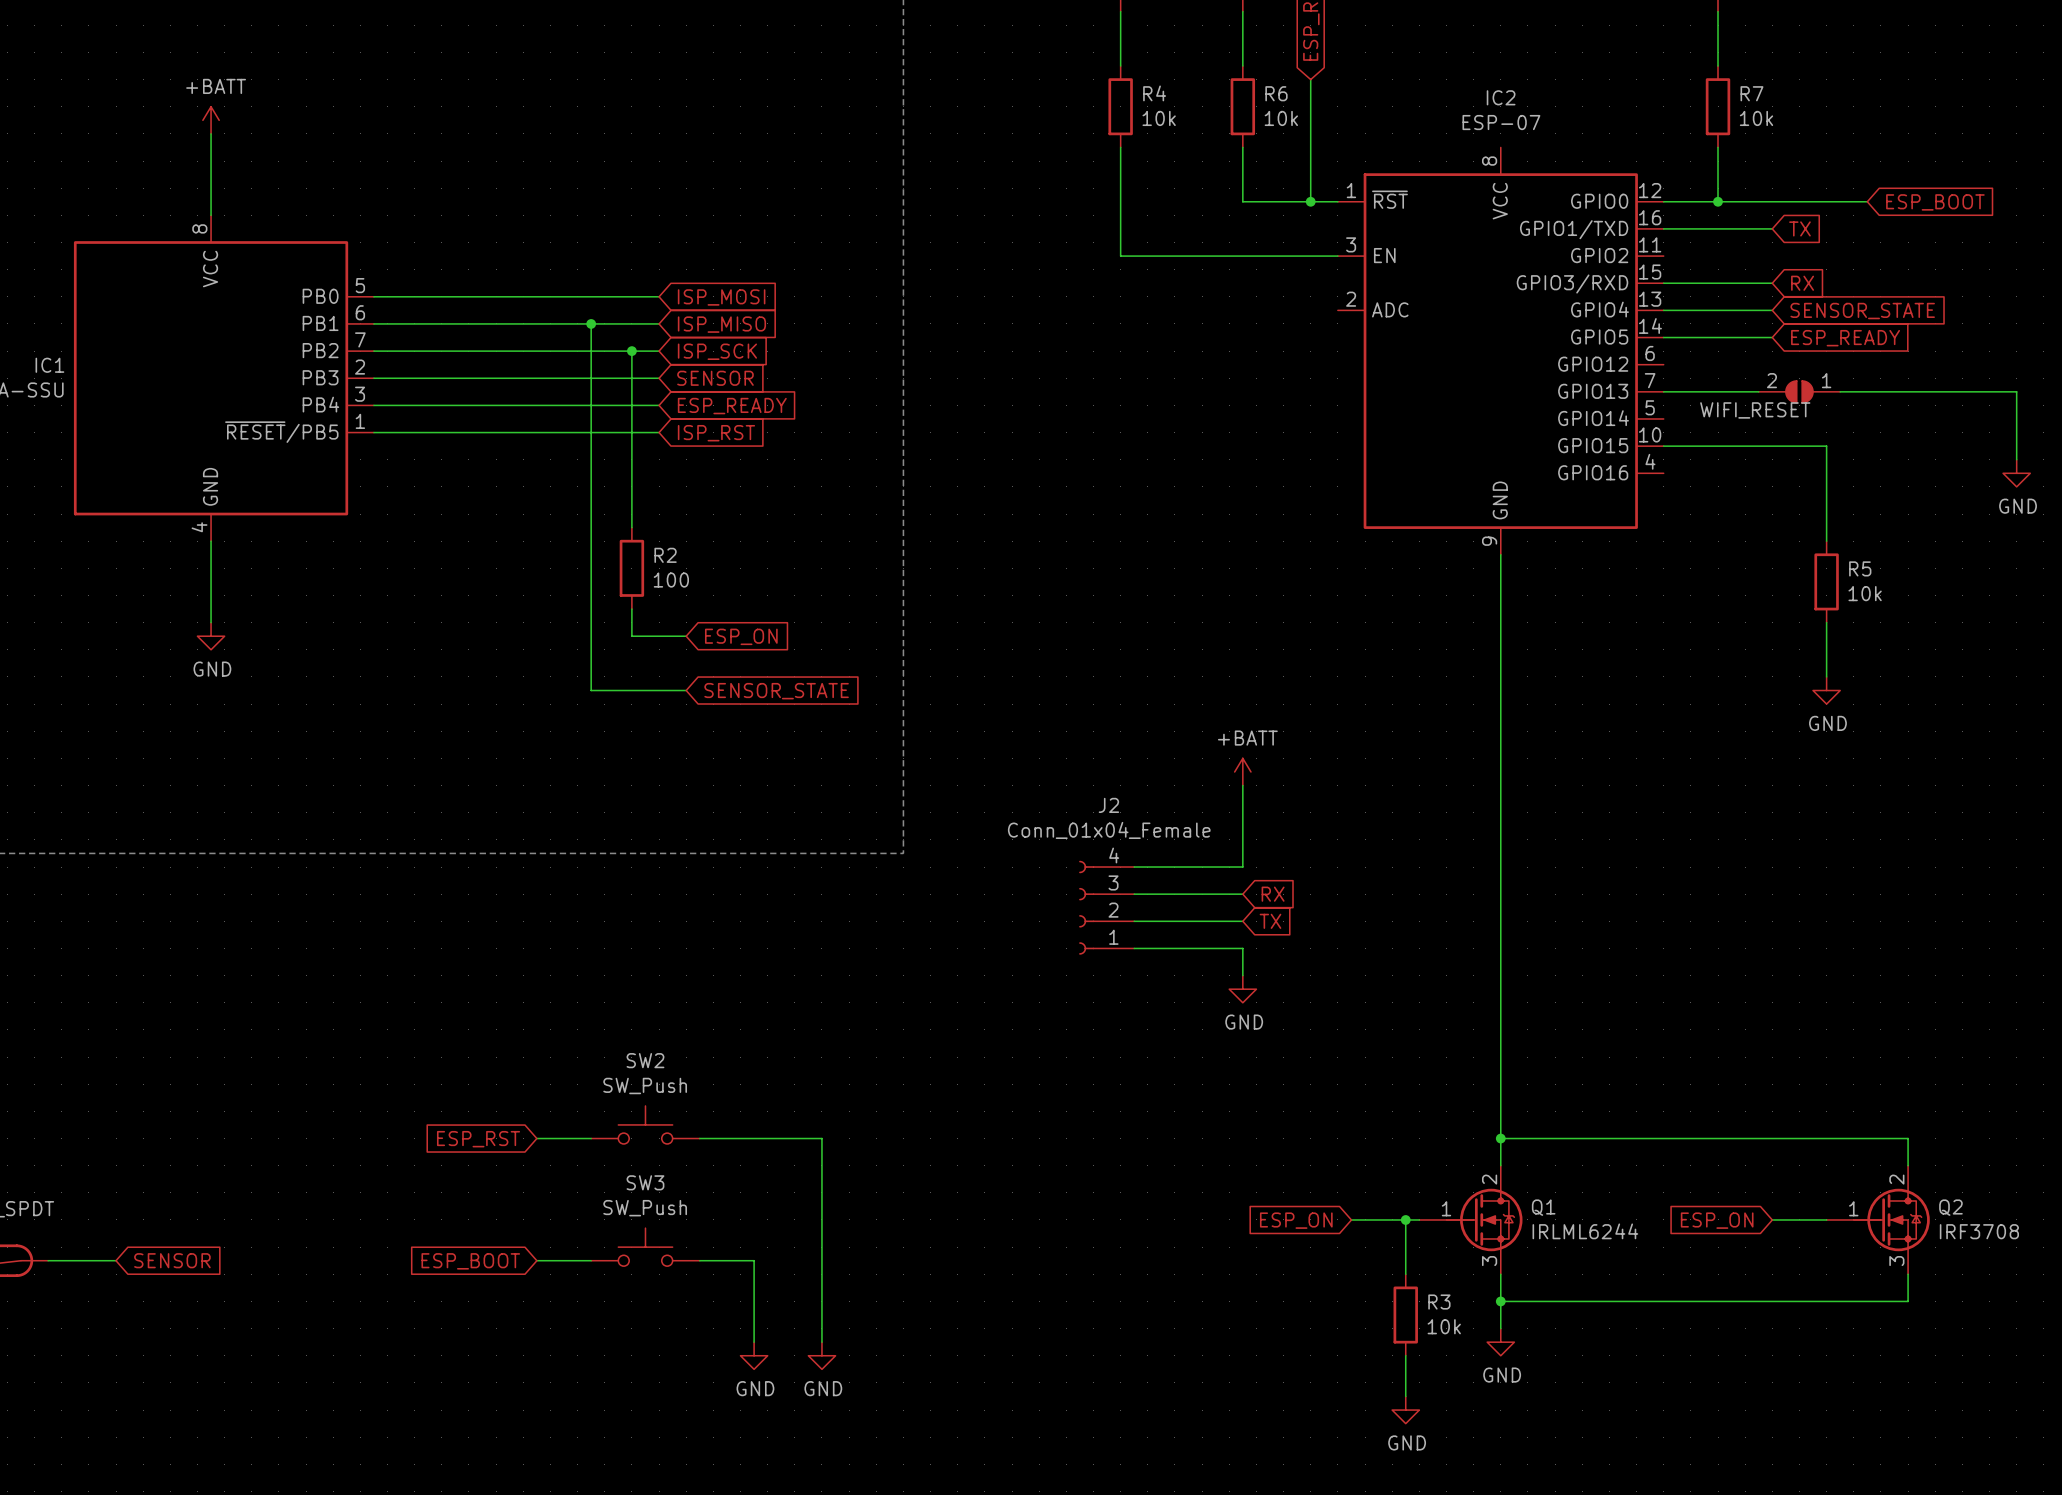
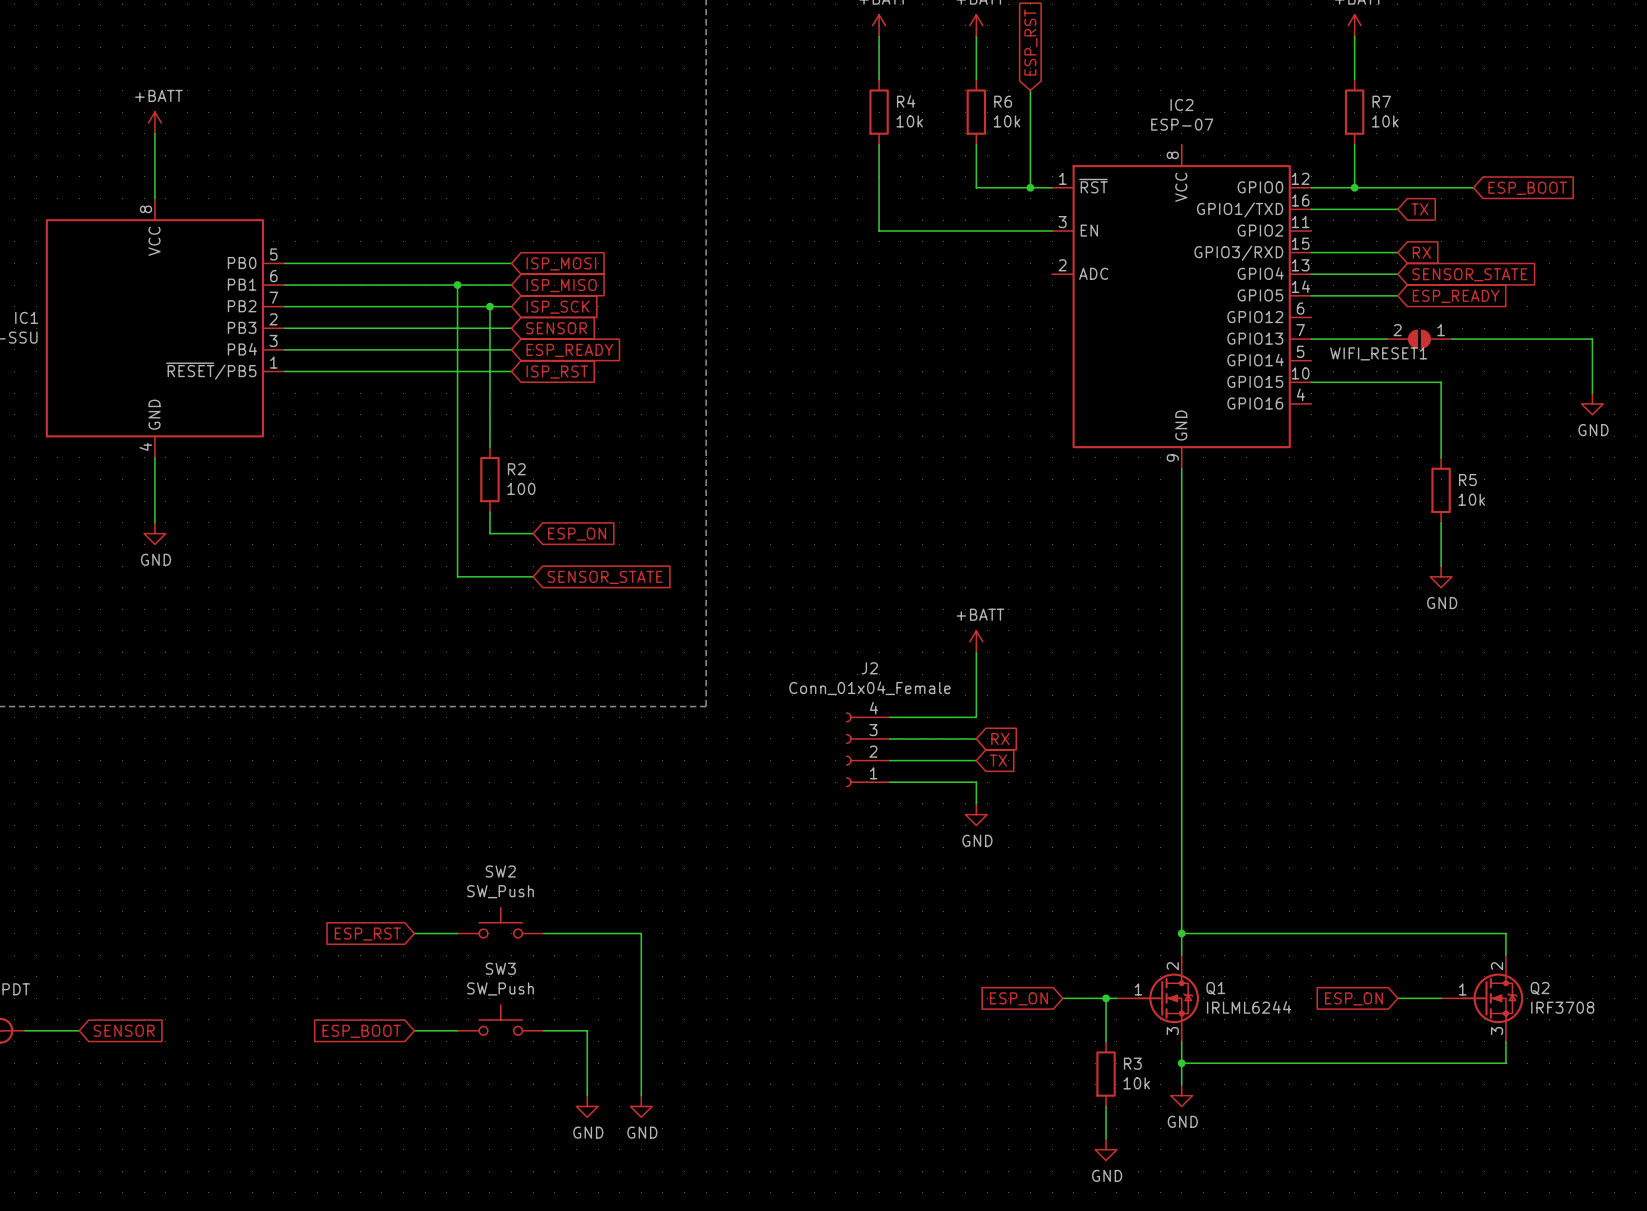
WIFI_RESET name: WIFI_RESET (1755, 410) -> WIFI_RESET1 (1378, 353)

